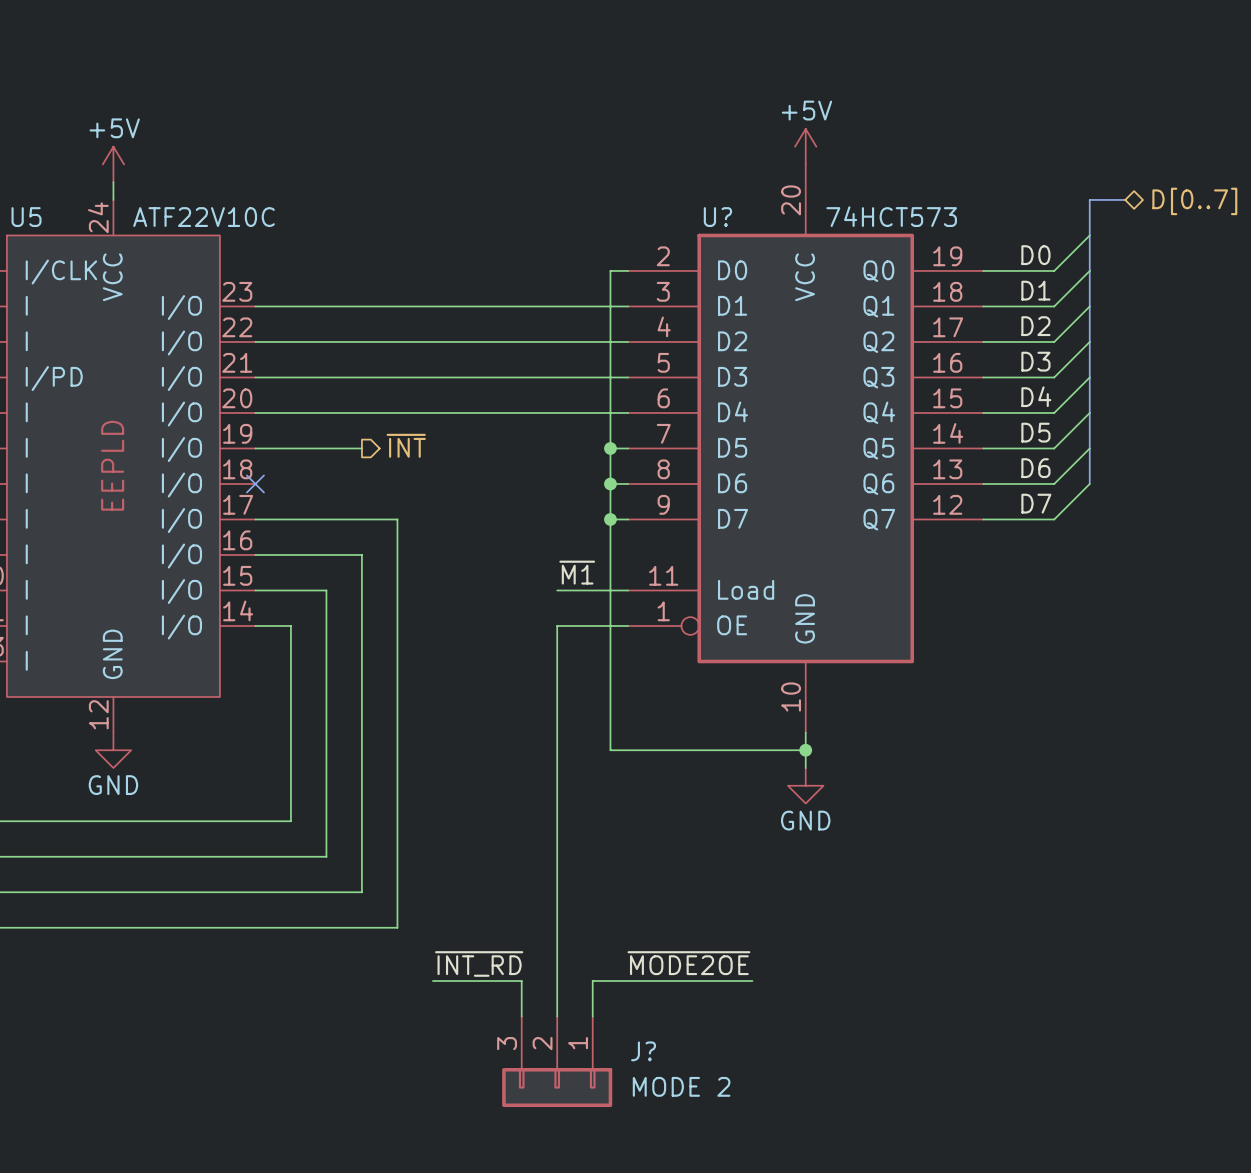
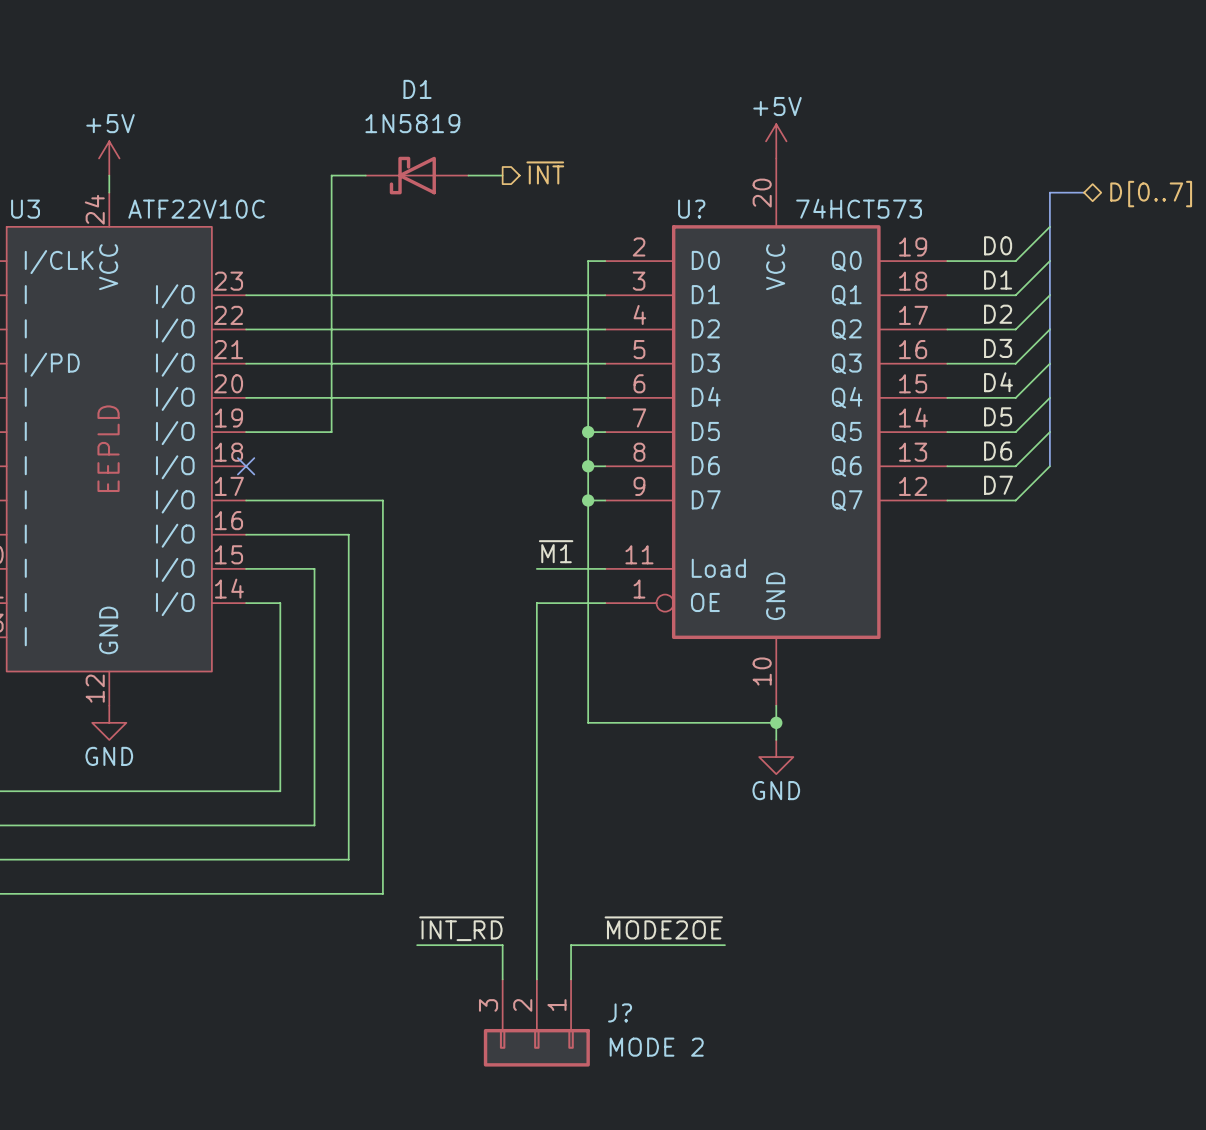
D1: none -> 1N5819 (417, 175)
wire: none -> (468, 175) (502, 175)
U5 name: U5 (26, 217) -> U3 (25, 209)
hierarchical label position: ~{INT} (406, 445) -> ~{INT} (545, 172)
wire: (344, 448) (361, 448) -> (331, 432) (331, 175) (365, 175)

